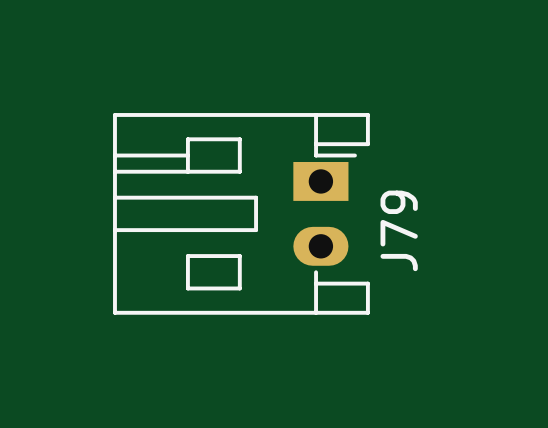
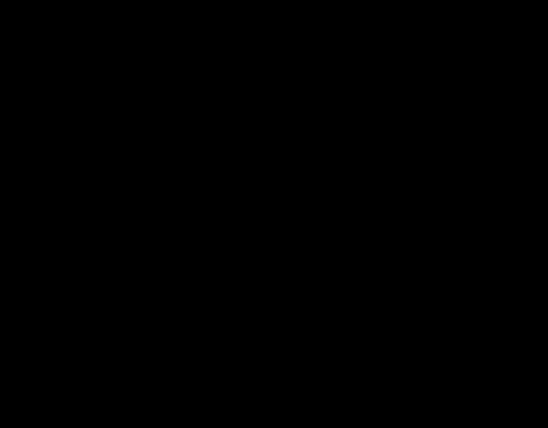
J79: (241, 213) -> none

